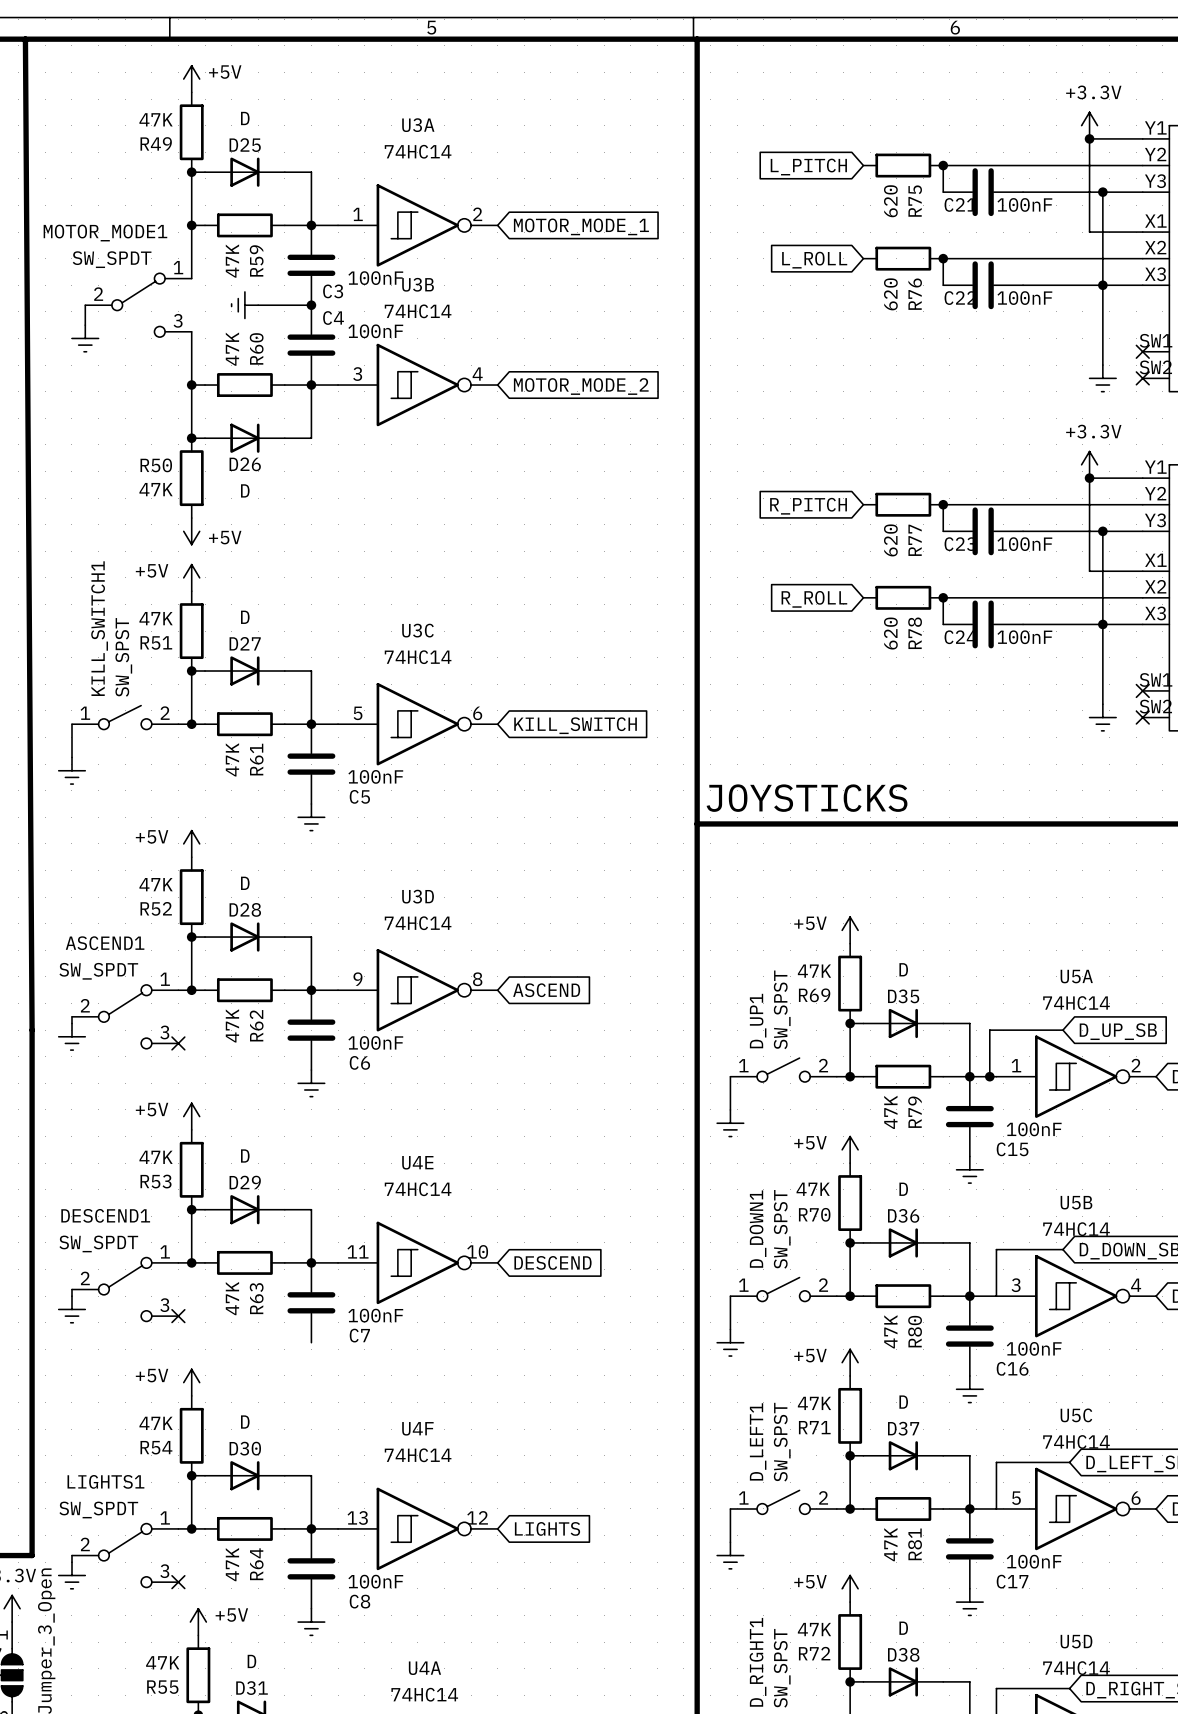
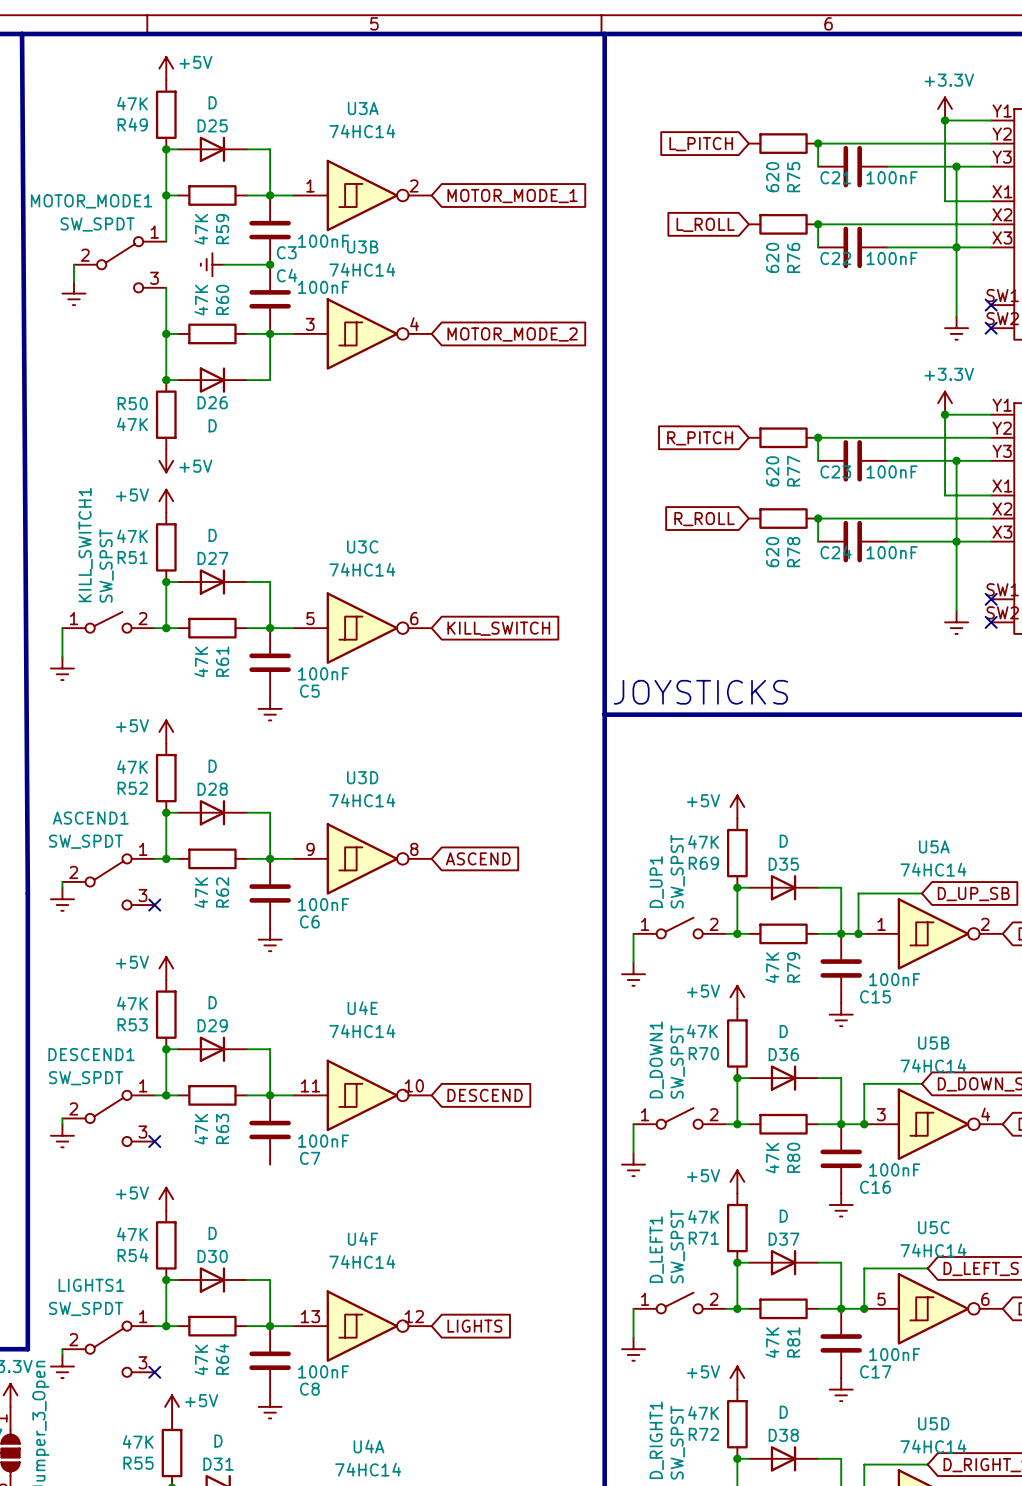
junction: none -> (864, 1124)
junction: none -> (864, 1308)

